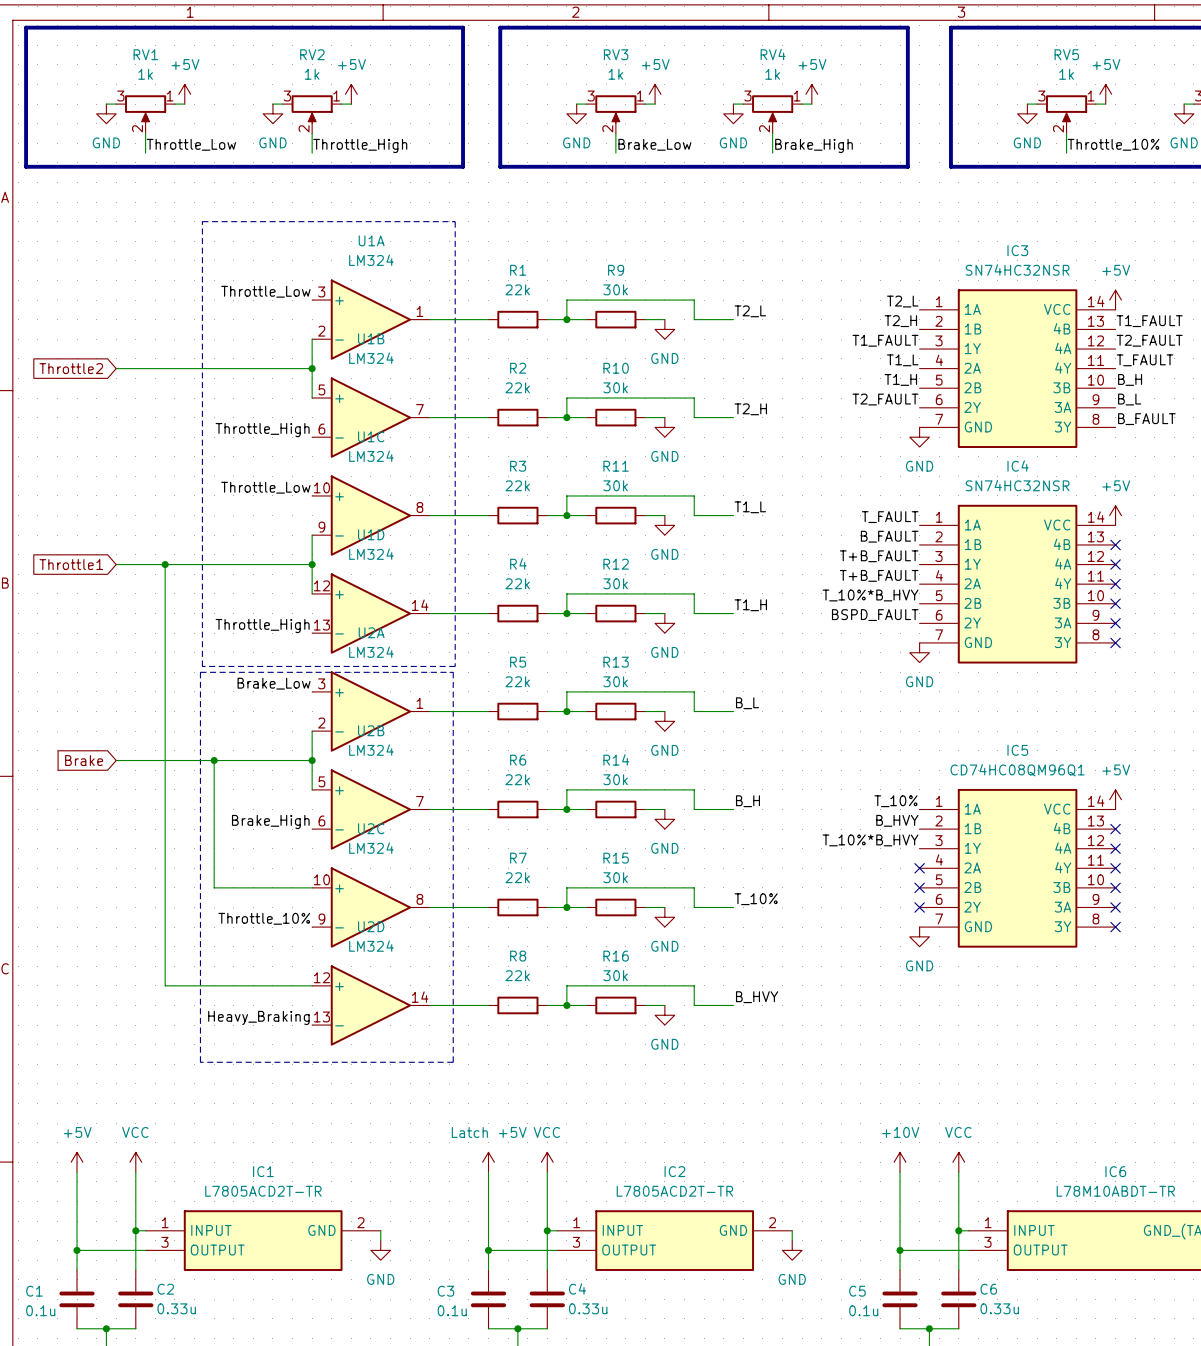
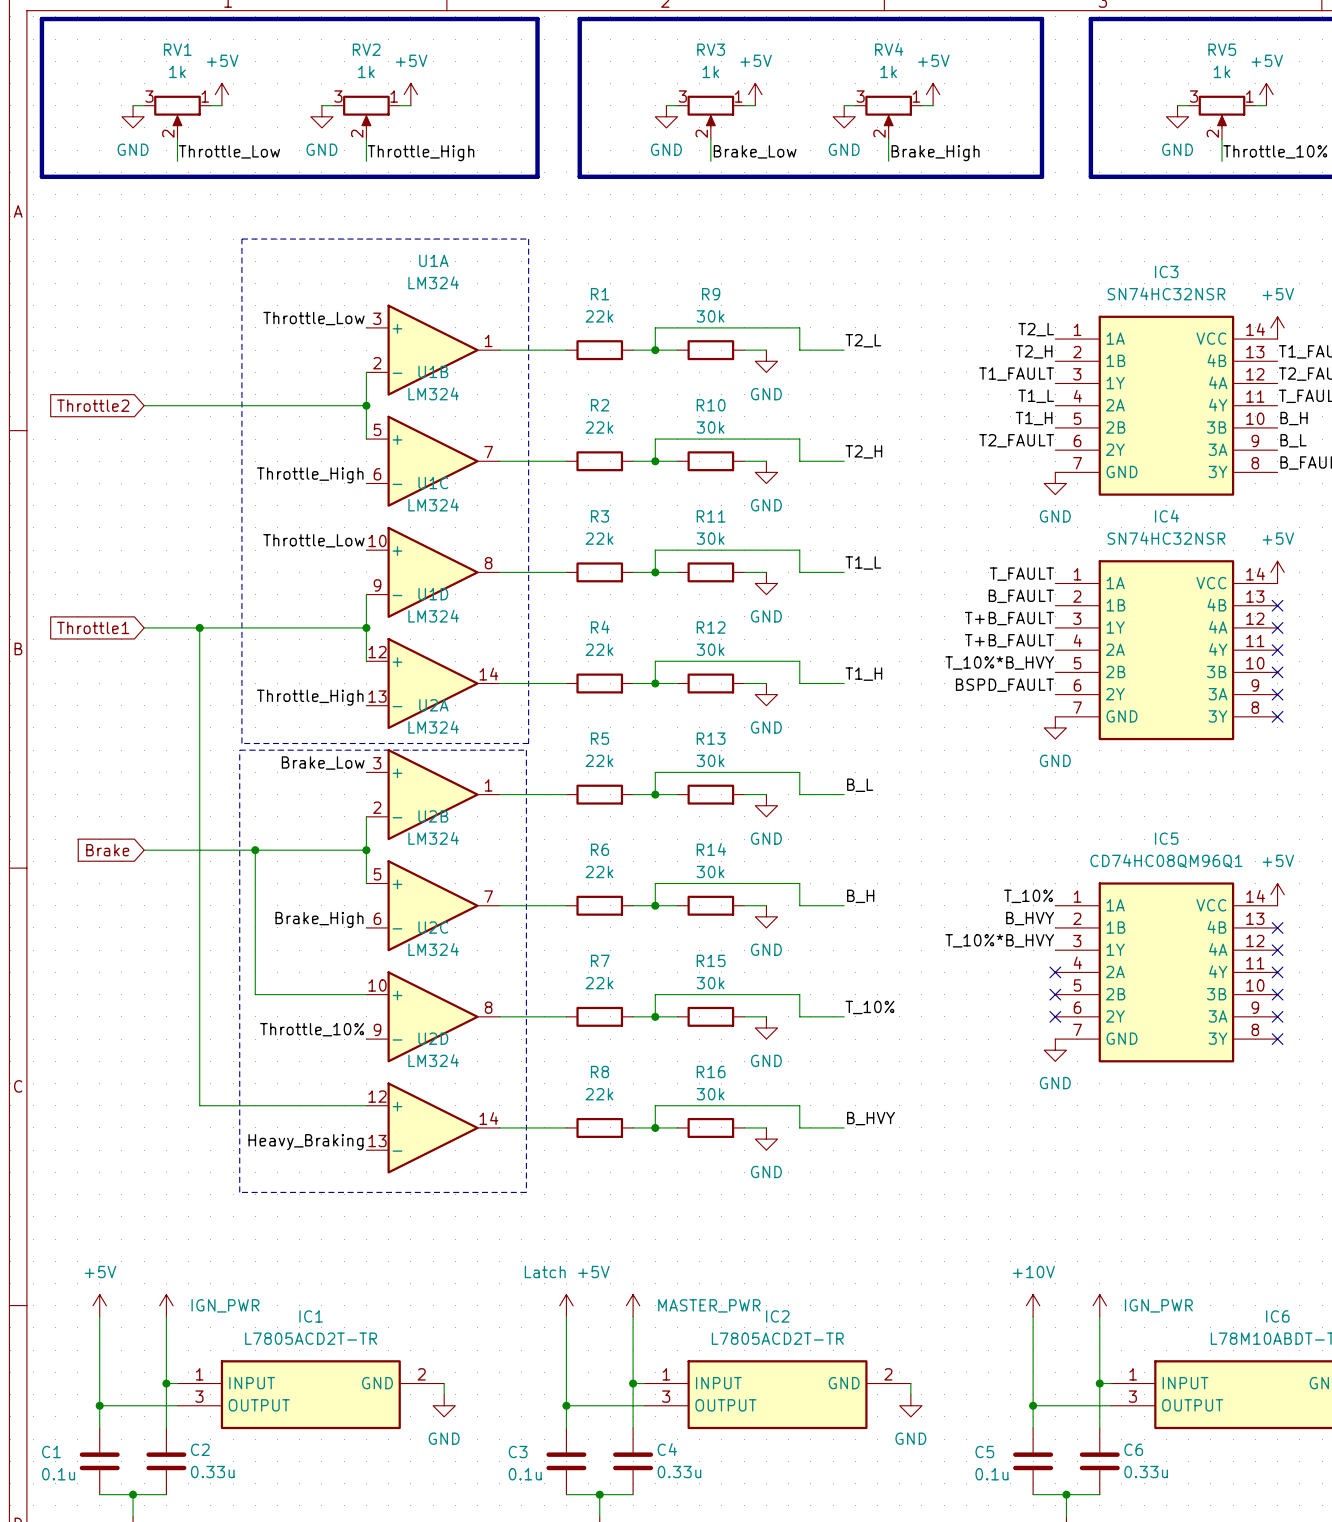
power symbol: VCC (135, 1162) -> IGN_PWR (166, 1305)
power symbol: VCC (547, 1162) -> MASTER_PWR (633, 1305)
power symbol: VCC (958, 1162) -> IGN_PWR (1099, 1305)

